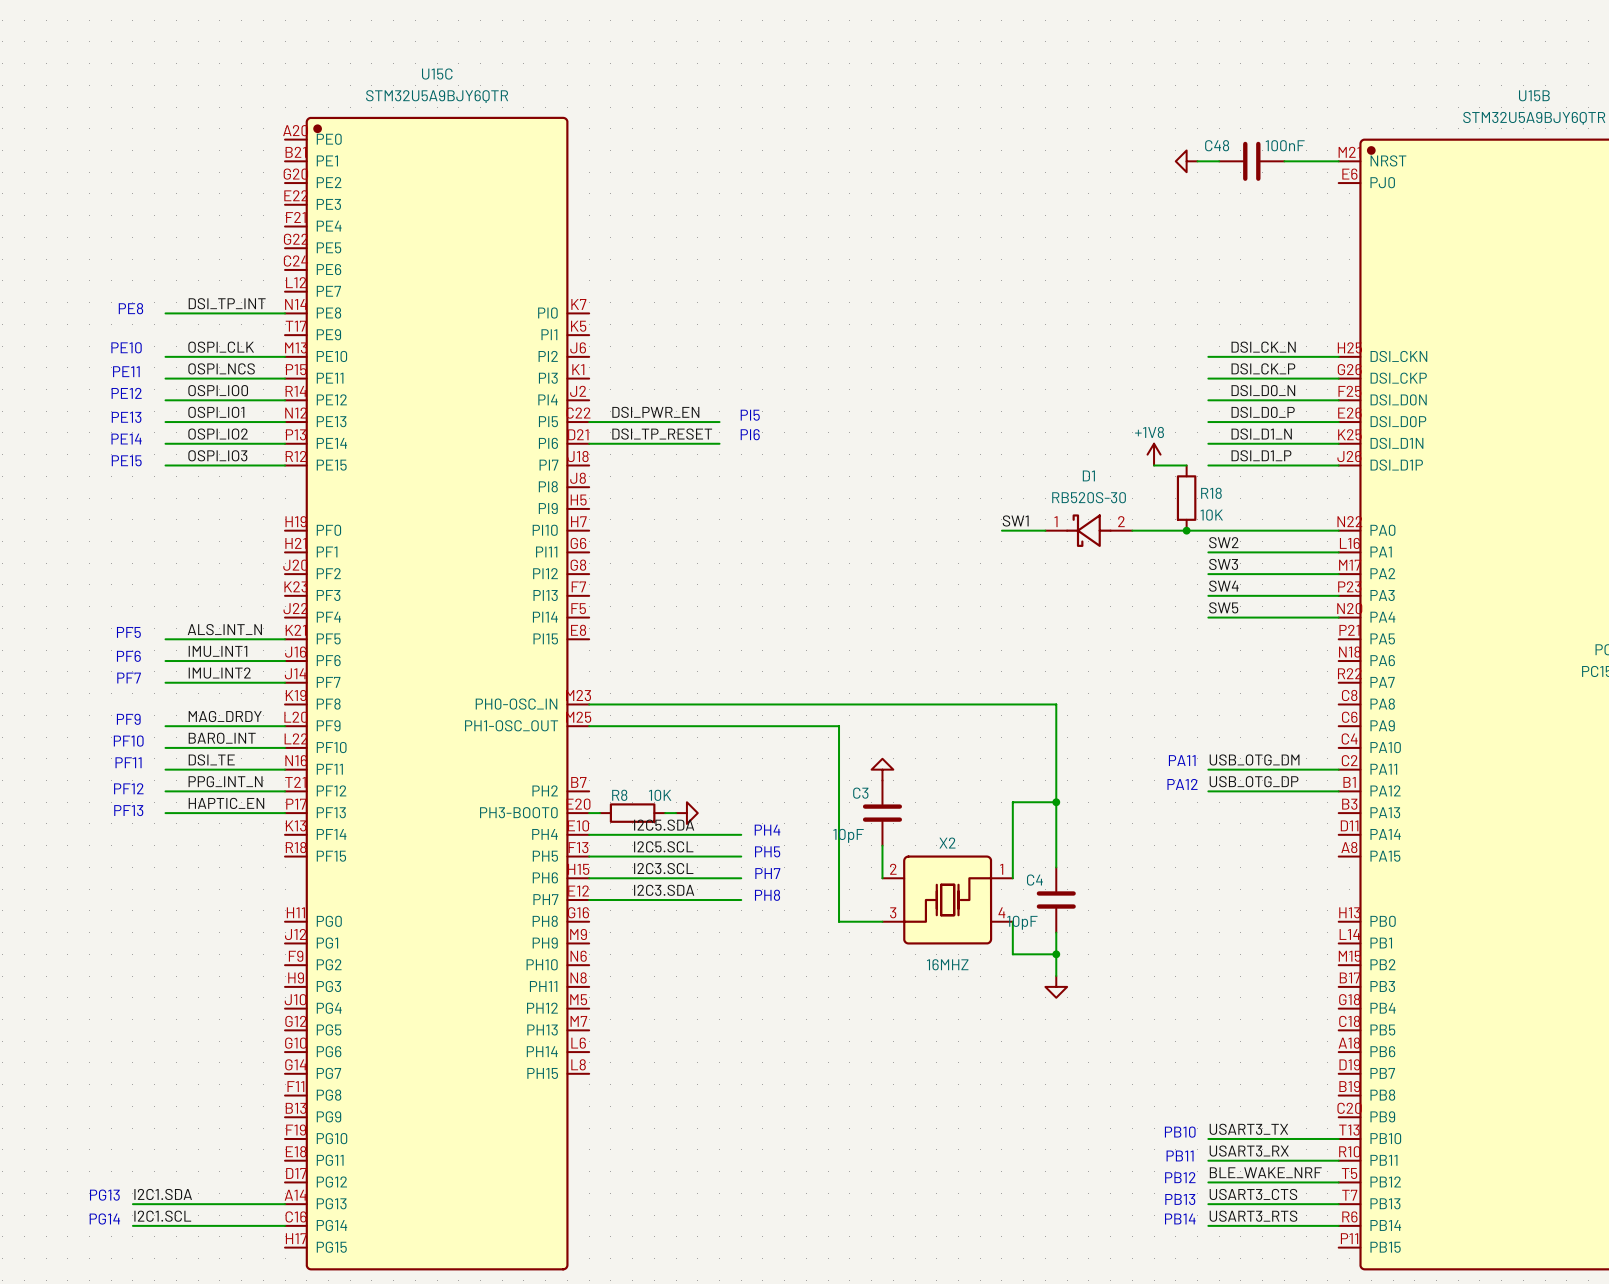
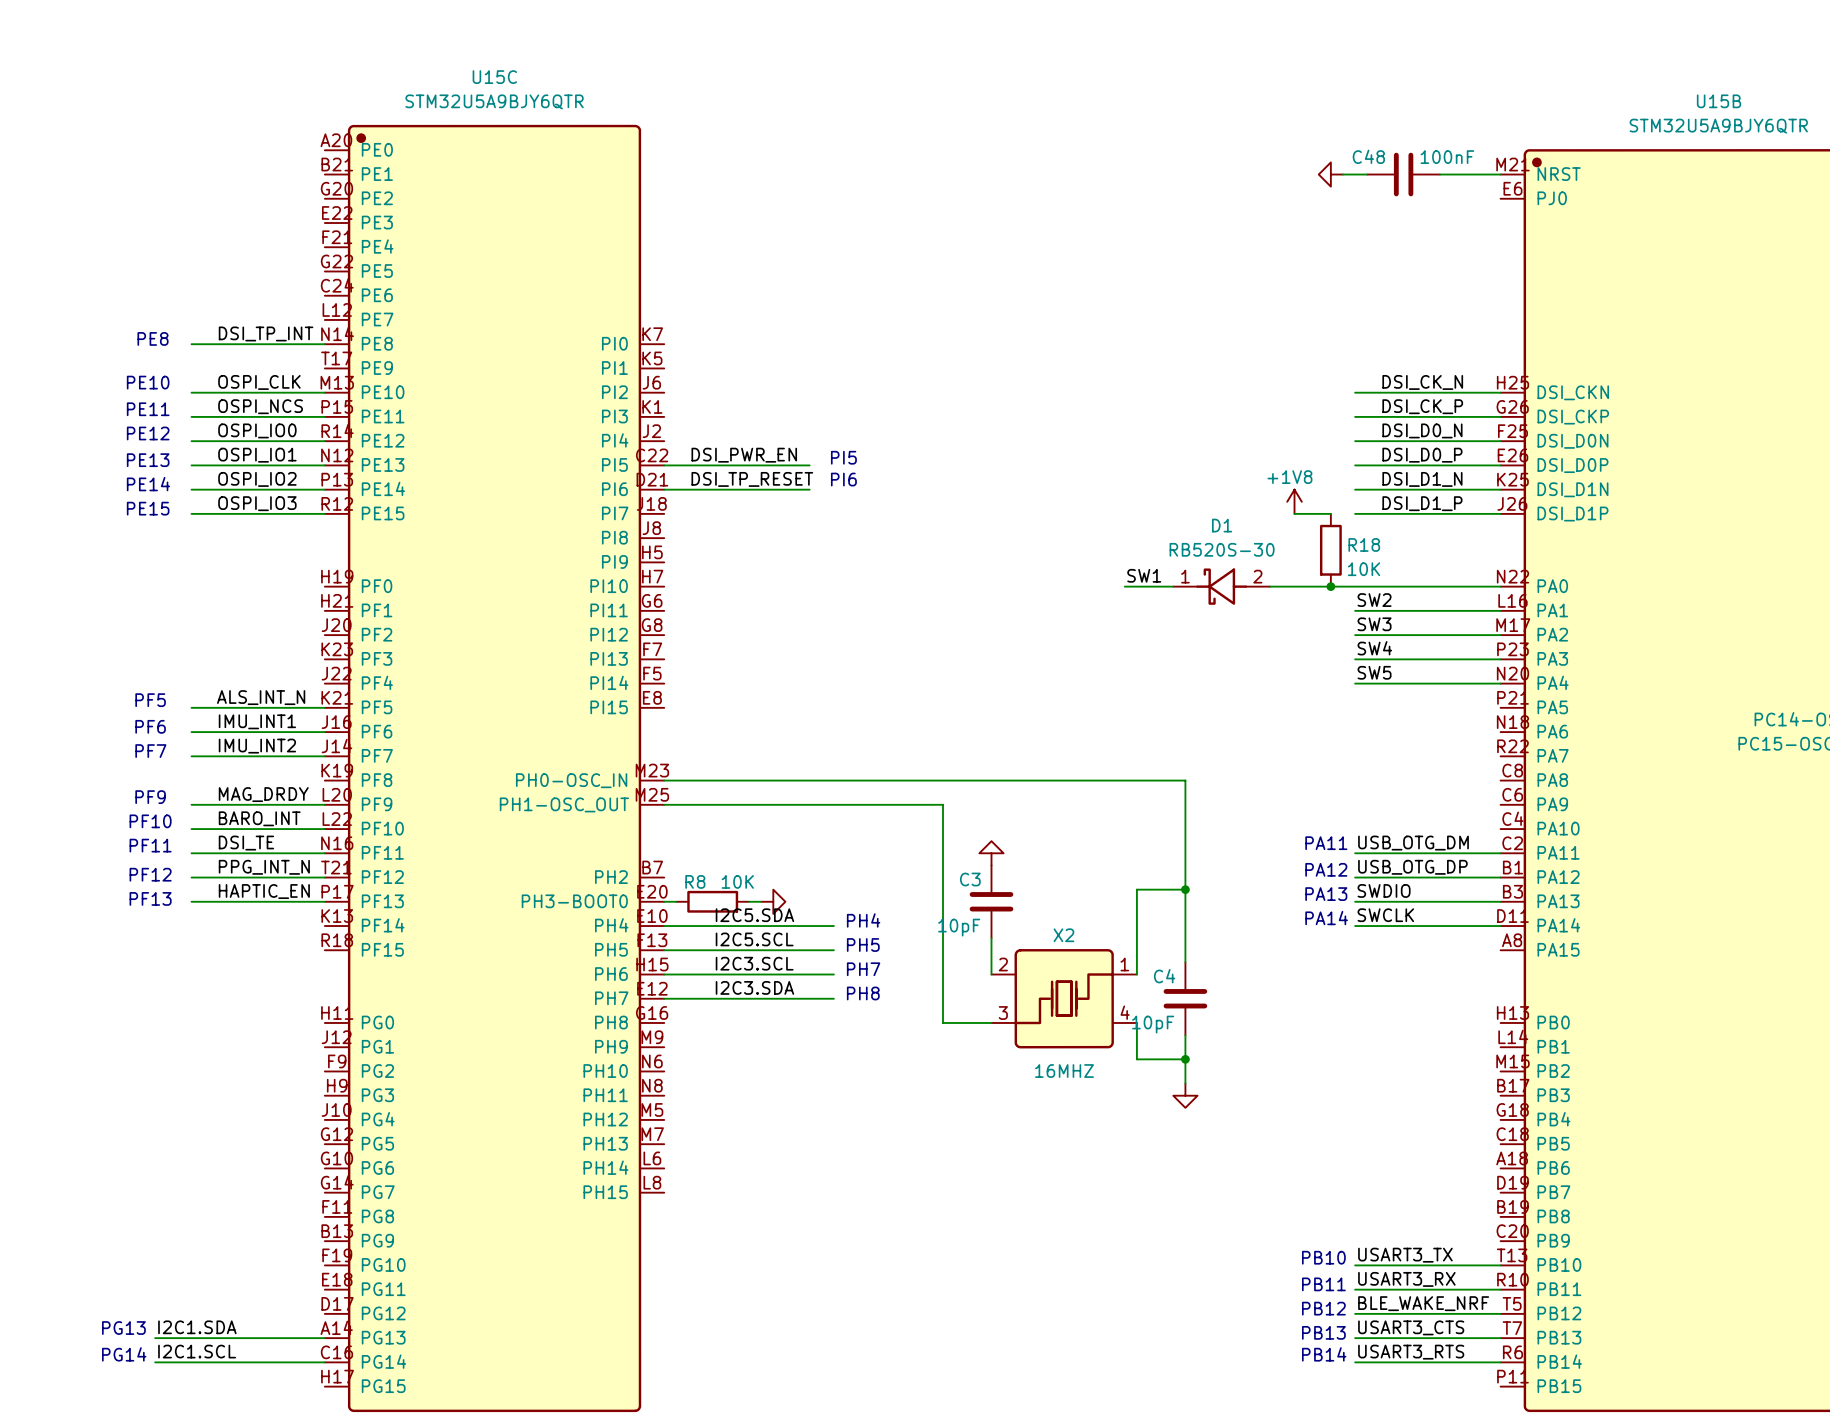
label: none -> SWDIO (1384, 890)
text: none -> PA13 (1326, 894)
wire: none -> (1355, 901) (1500, 901)
label: none -> SWCLK (1385, 915)
text: none -> PA14 (1326, 918)
wire: none -> (1355, 926) (1500, 926)

